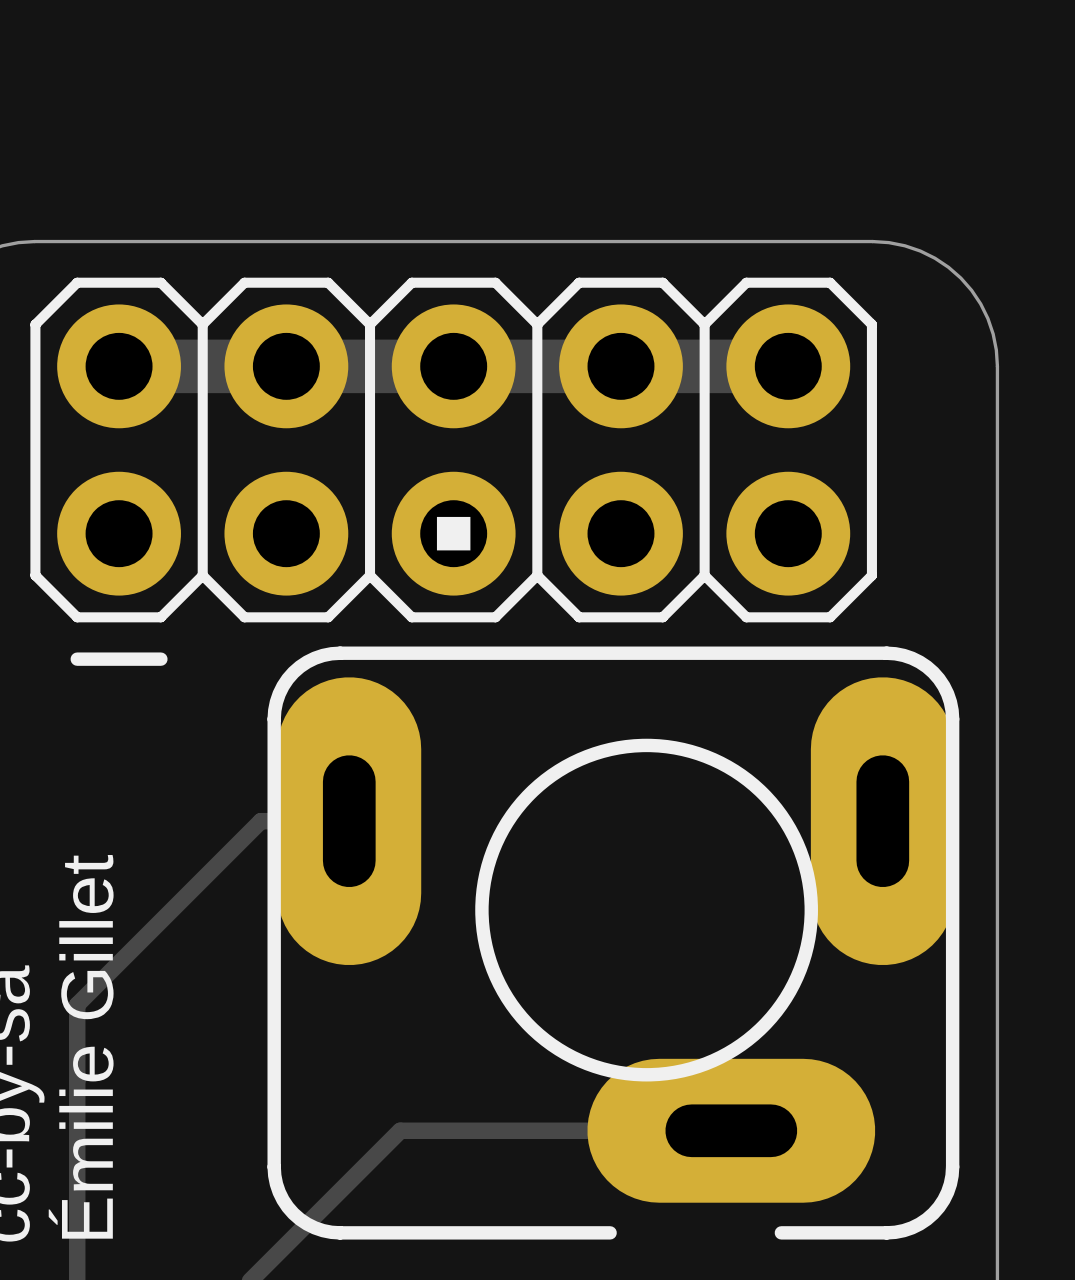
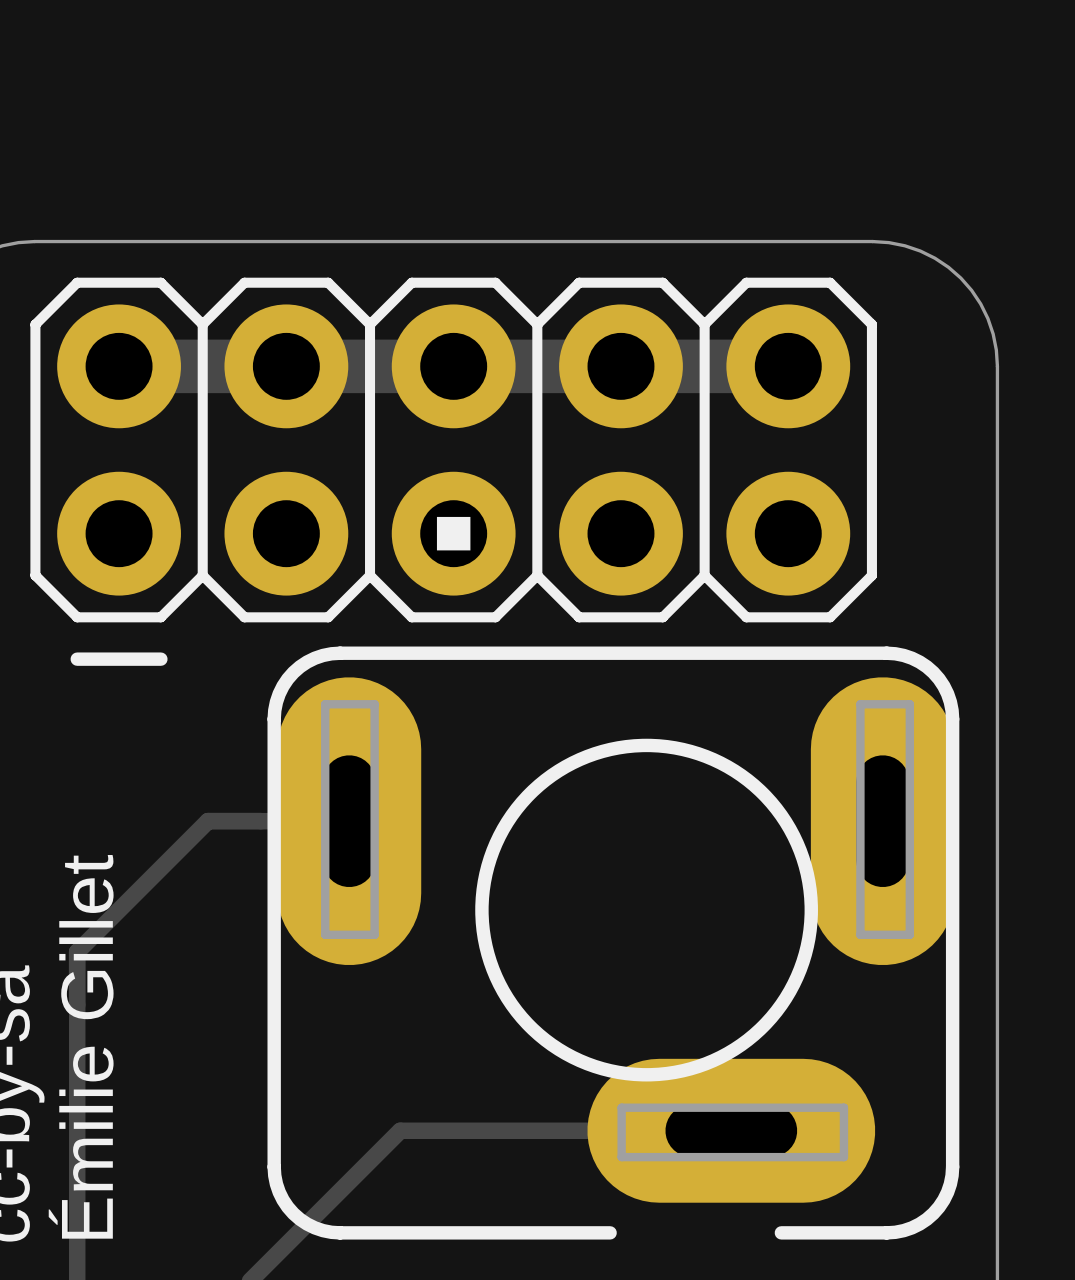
part footprint: [267, 646, 960, 1240] -> [267, 646, 960, 1240]
track: (260, 821) (77, 1004) -> (260, 821) (207, 821) (77, 951) (77, 1004)

